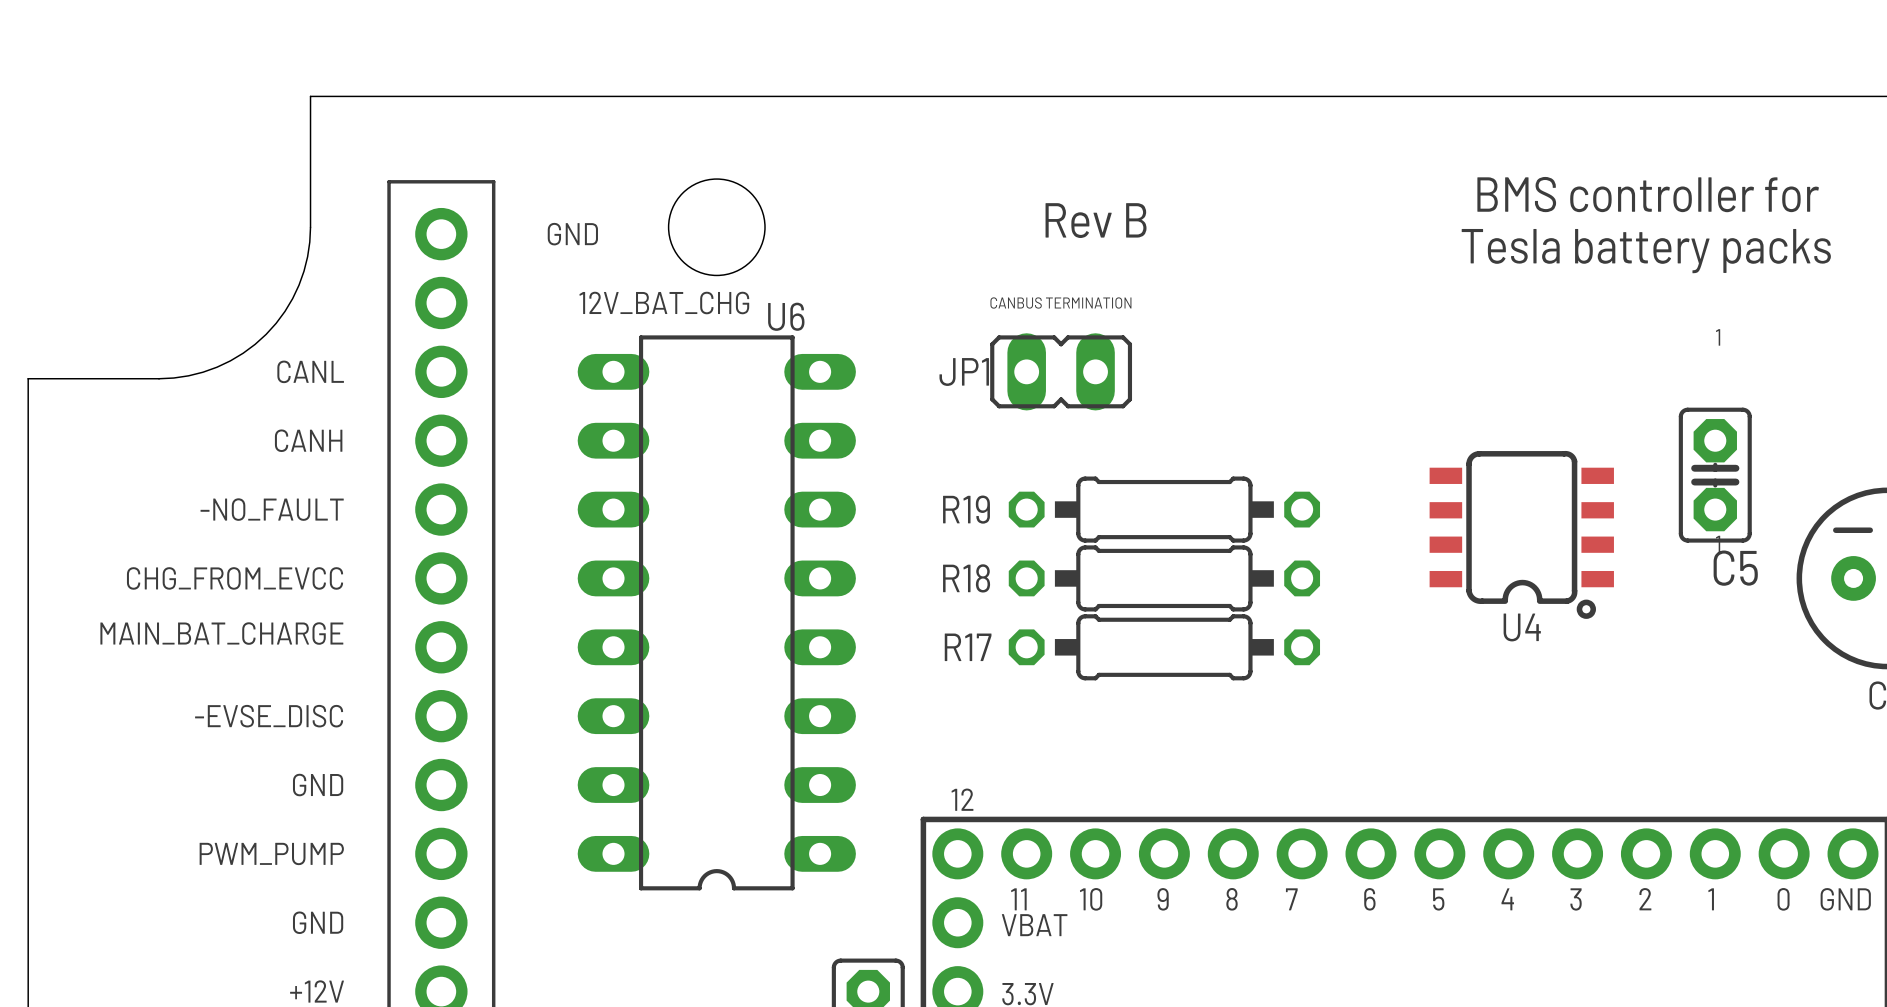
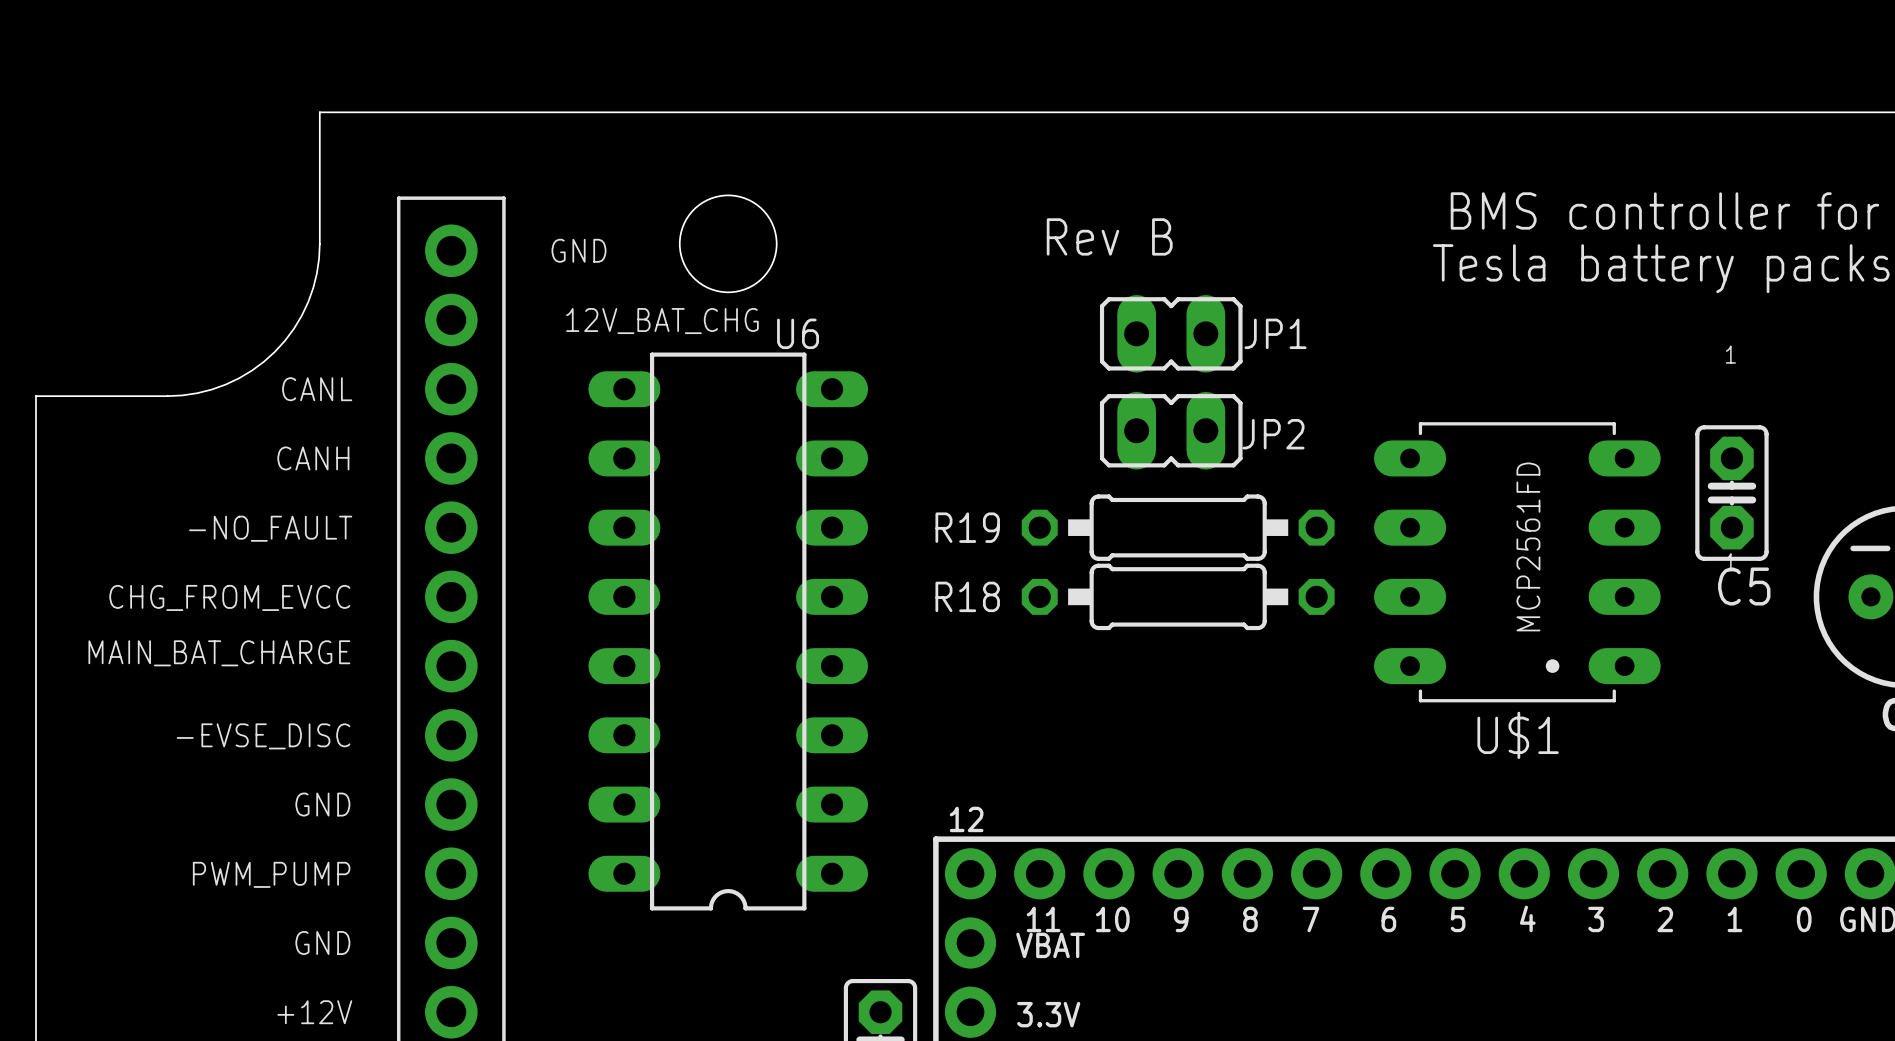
text: CANBUS TERMINATION (1060, 303) -> none
JP1 name position: JP1 (964, 371) -> JP1 (1275, 333)
JP1 position: (1061, 371) -> (1171, 333)
JP2: none -> (1171, 430)
U4: (1521, 534) -> none
U$1: none -> (1517, 562)
R17: (1164, 647) -> none

